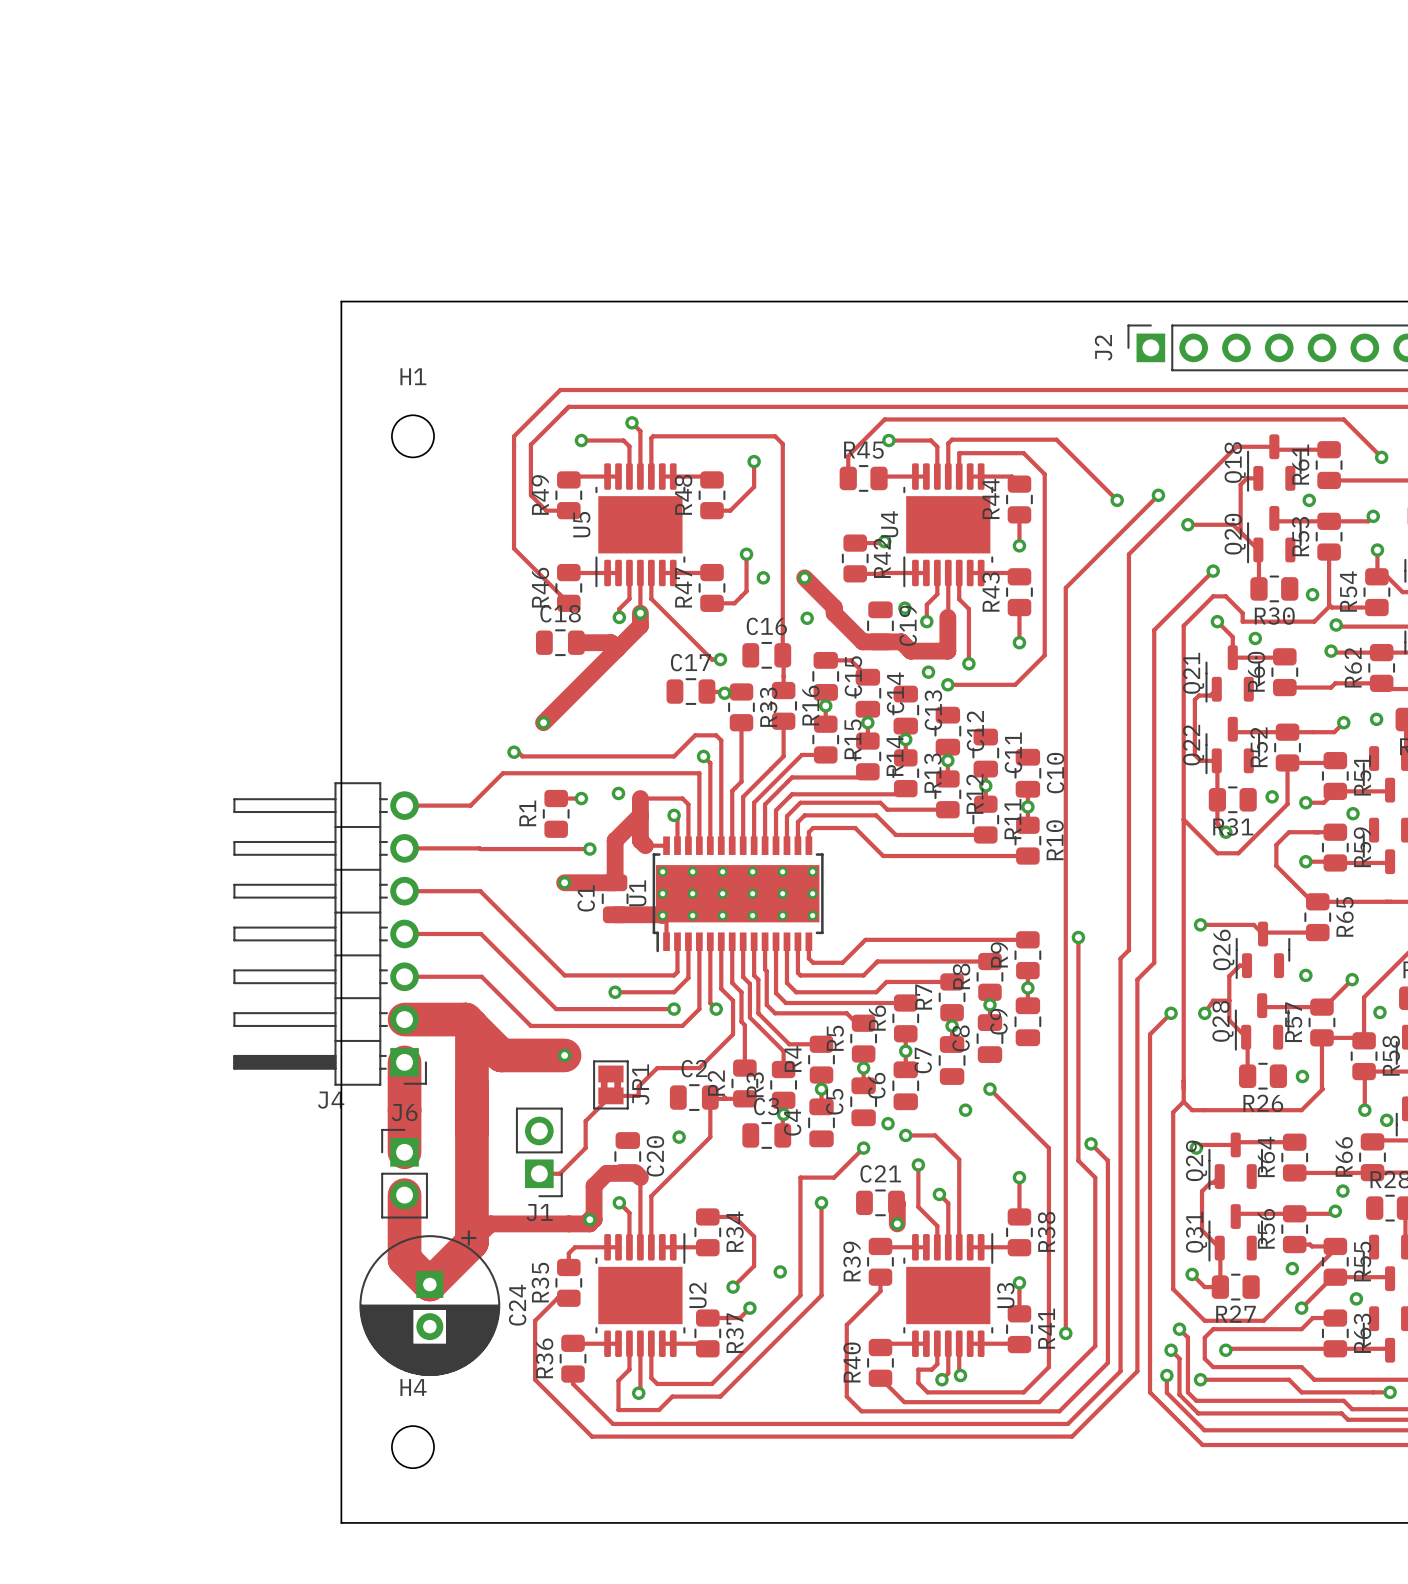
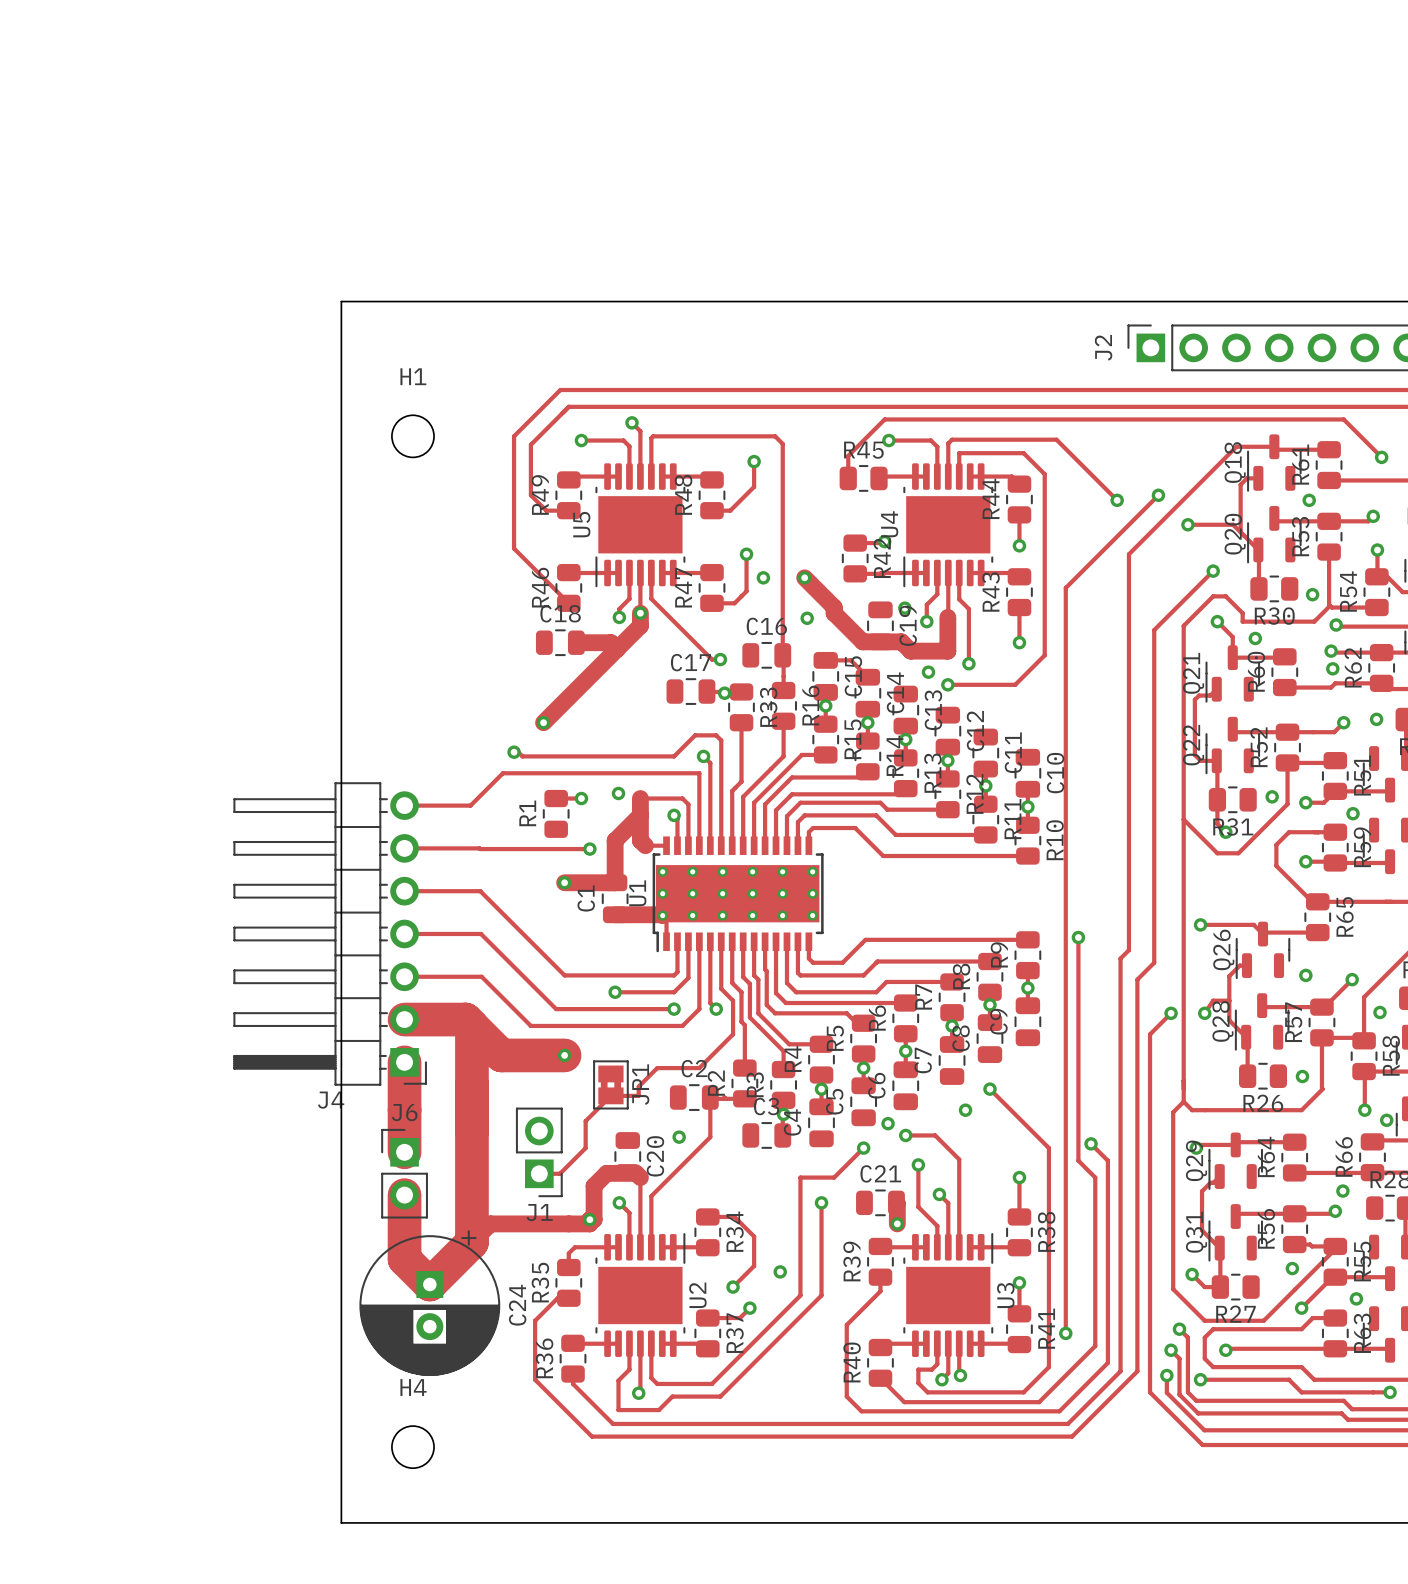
via: none -> (1332, 668)

